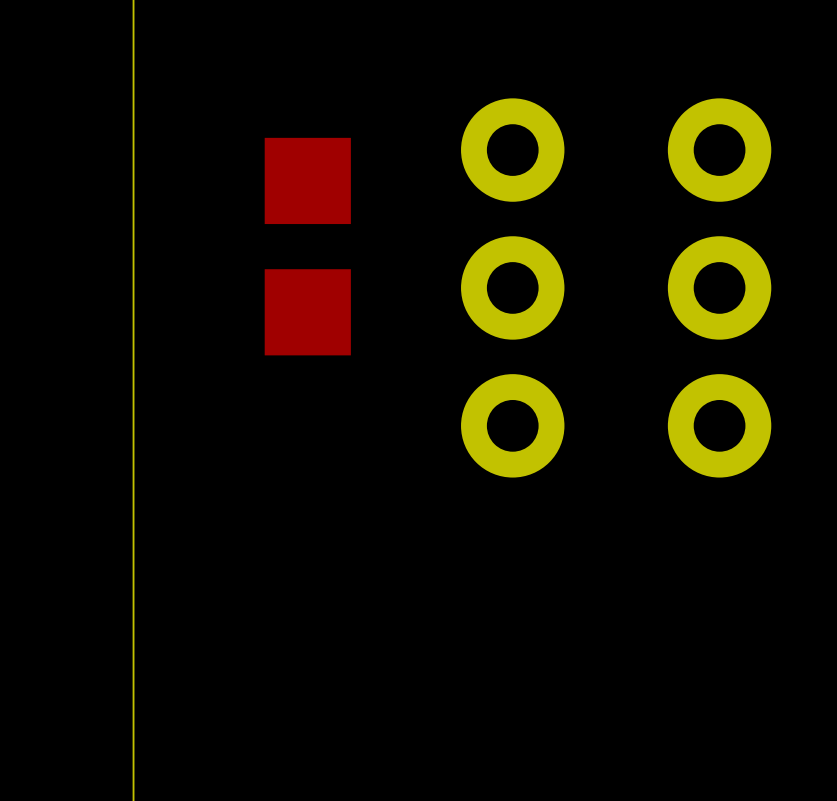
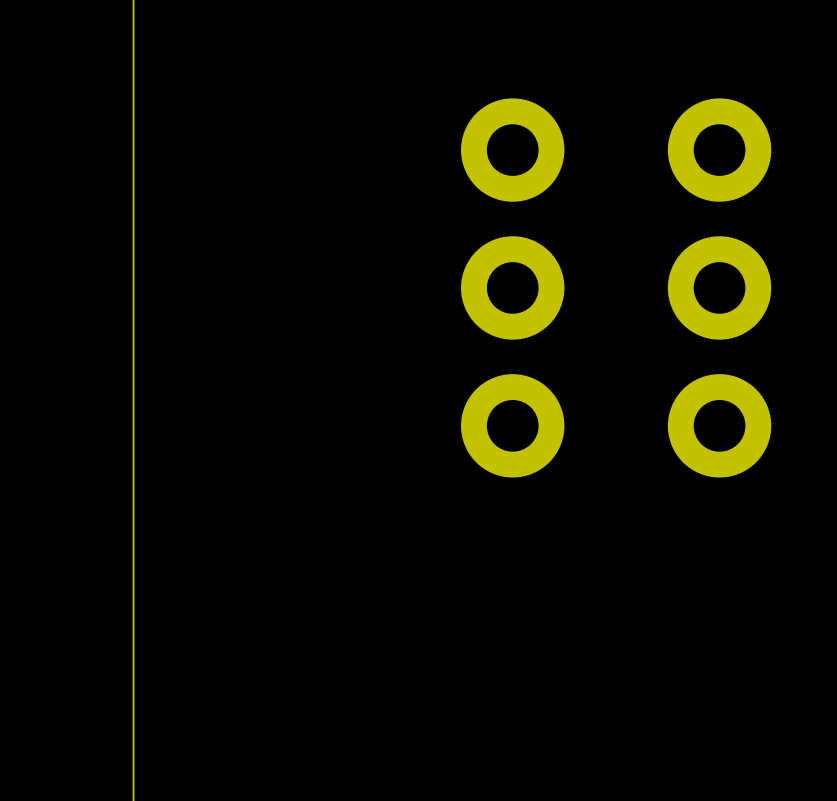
part: (307, 180) -> none
part: (307, 312) -> none

